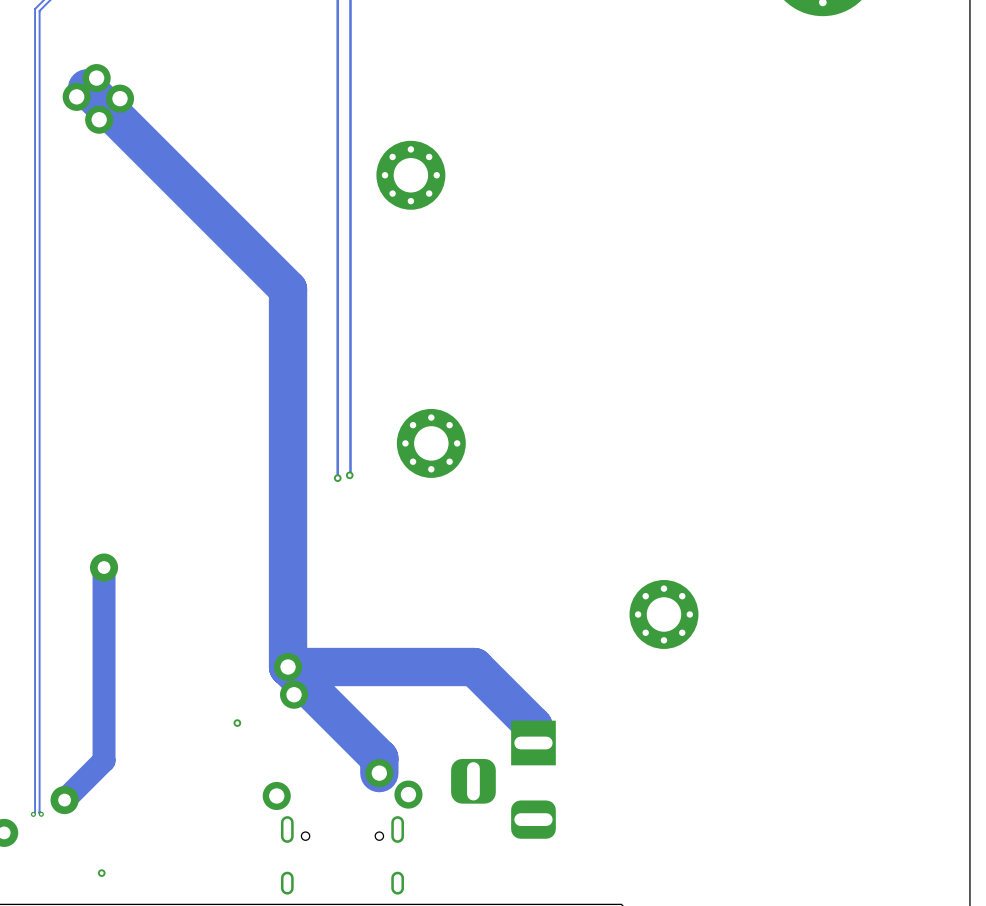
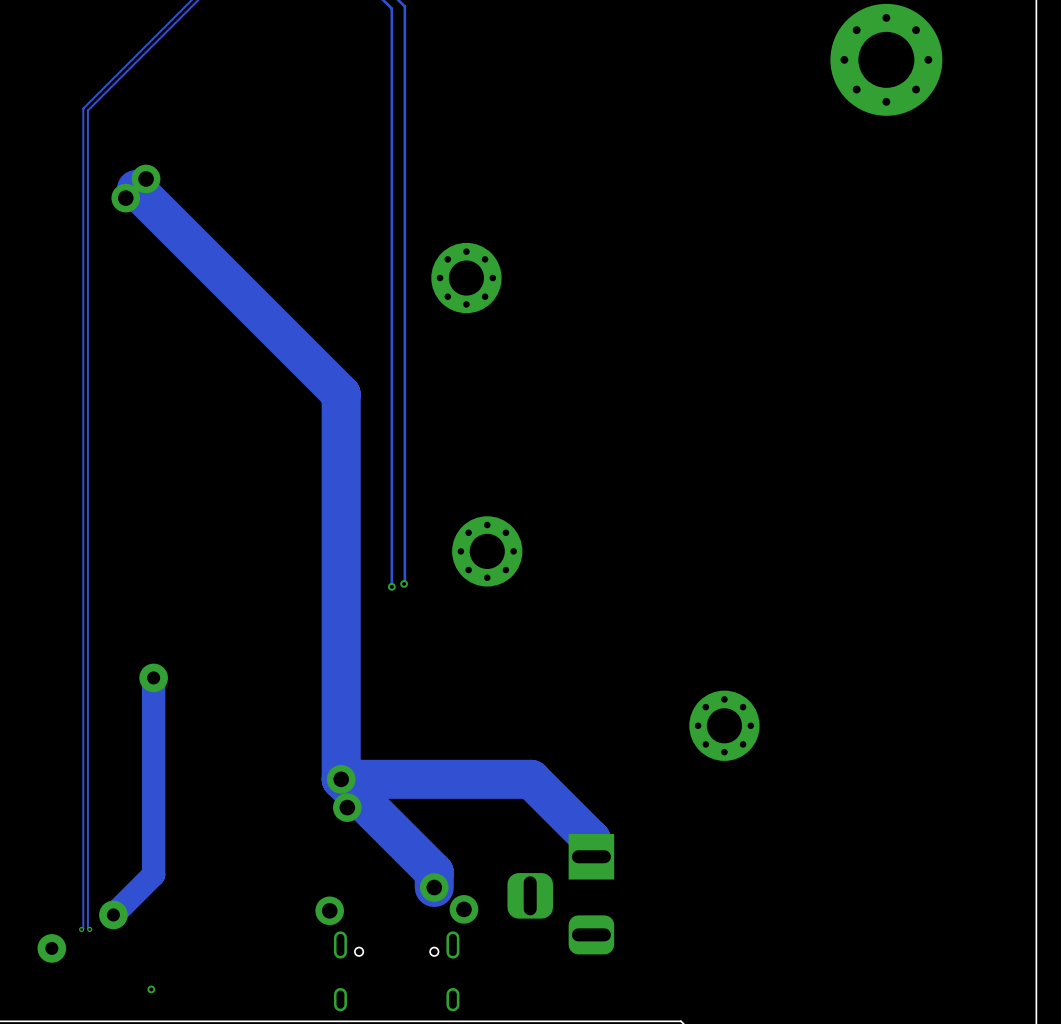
via: (120, 98) -> none
via: (99, 119) -> none
via: (237, 723) -> none

